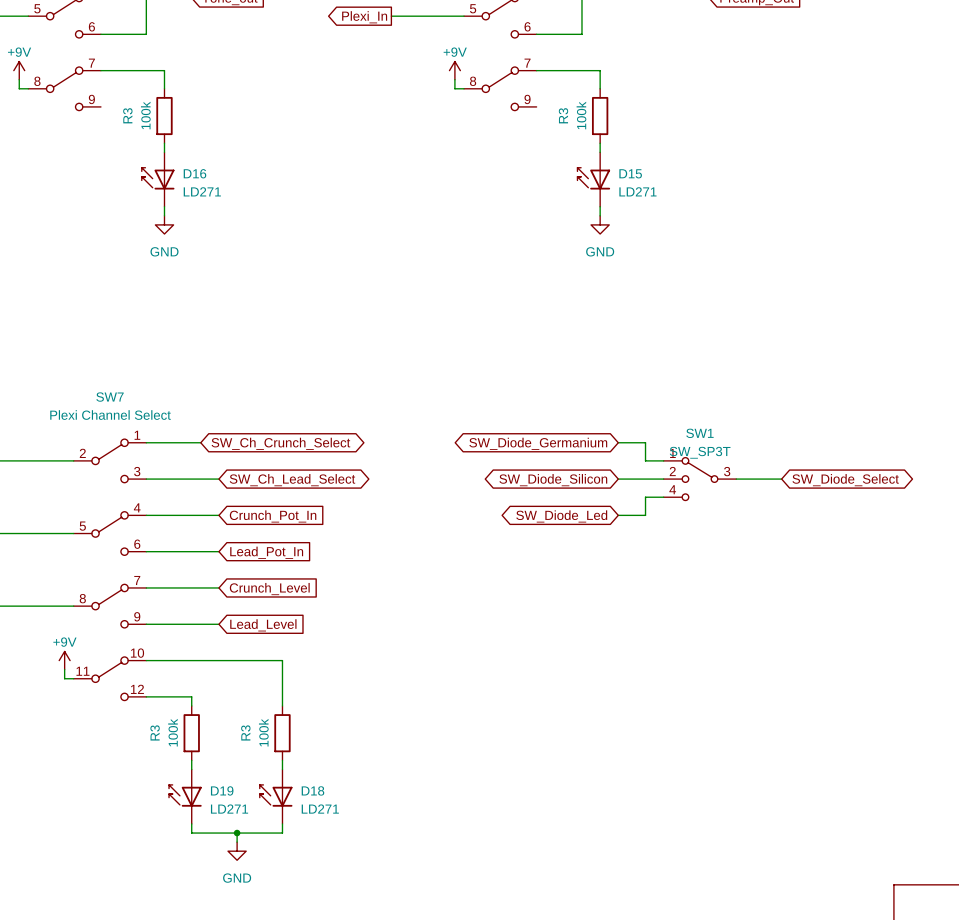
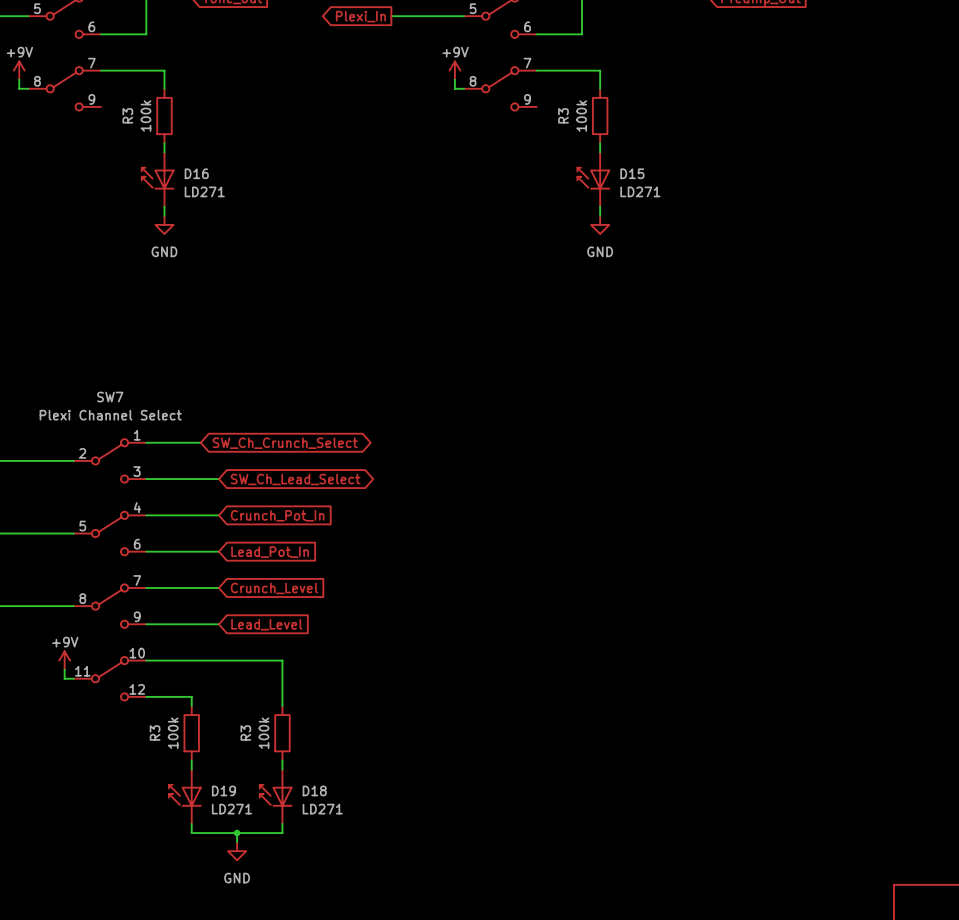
wire: (618, 442) (645, 442) (645, 460) (663, 460) -> none
global label: SW_Diode_Germanium (538, 443) -> none
wire: (618, 479) (663, 479) -> none
SW1: SW_SP3T (699, 479) -> none
wire: (736, 479) (781, 479) -> none
global label: SW_Diode_Silicon (553, 480) -> none
global label: SW_Diode_Select (845, 480) -> none
wire: (663, 497) (645, 497) (645, 515) (618, 515) -> none
global label: SW_Diode_Led (561, 516) -> none

